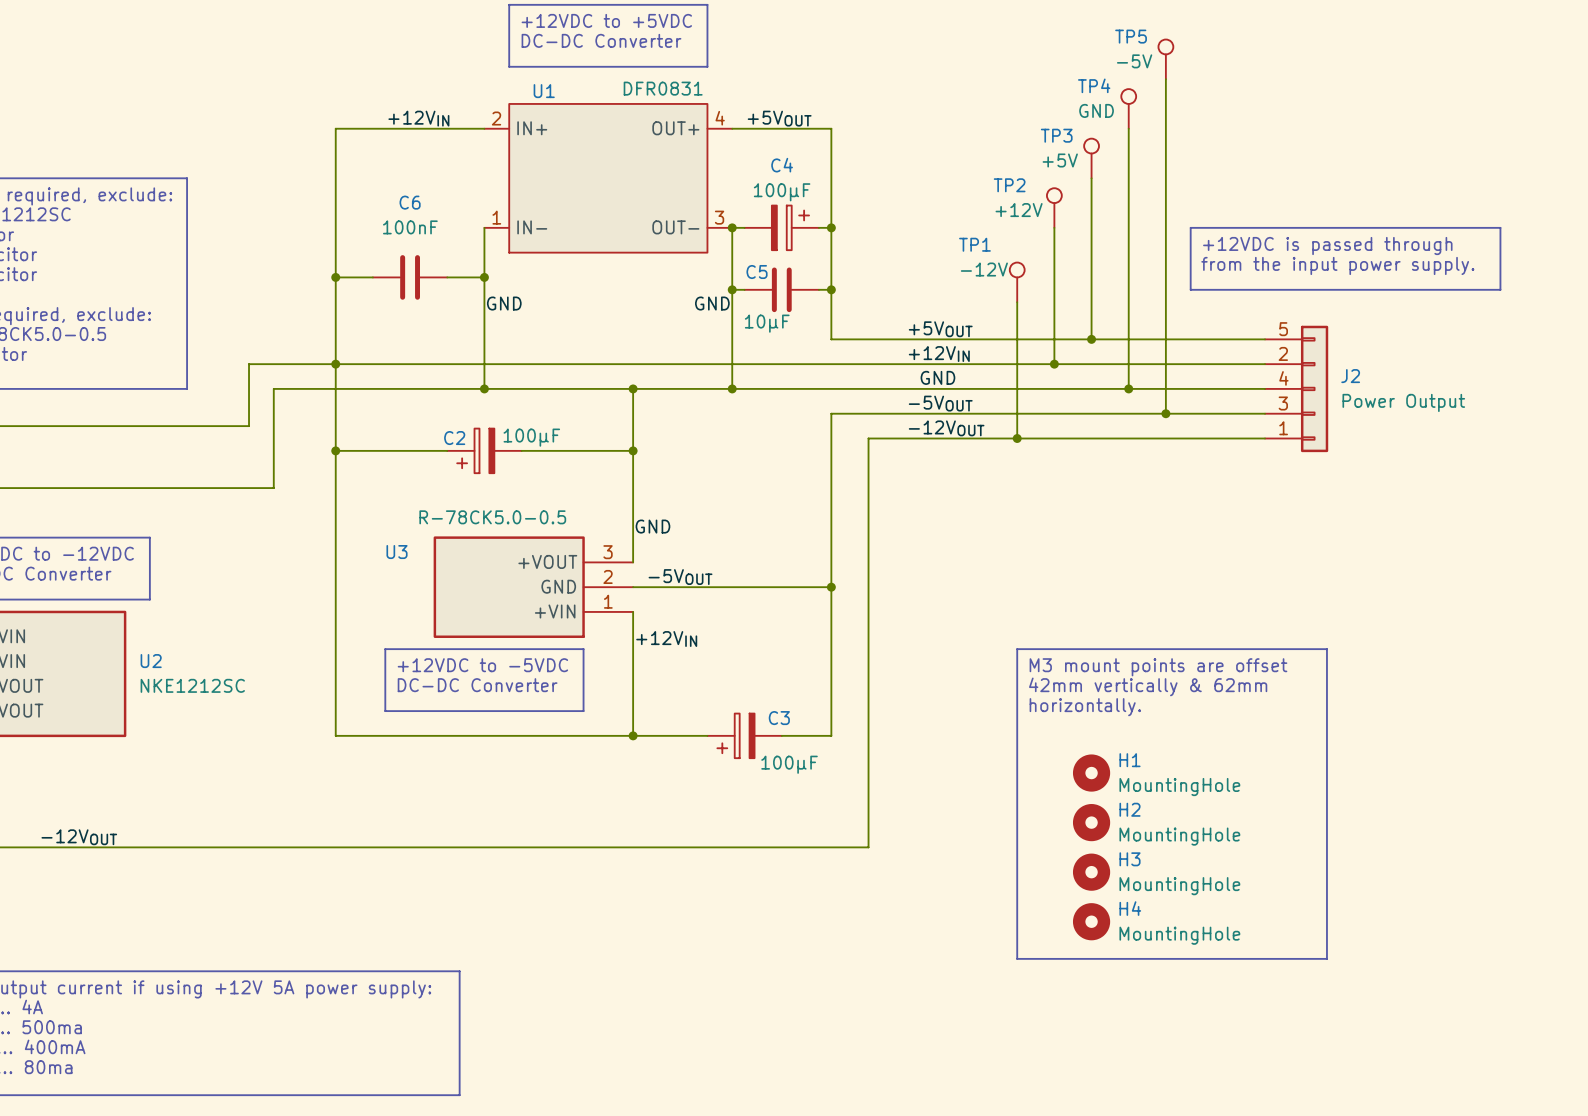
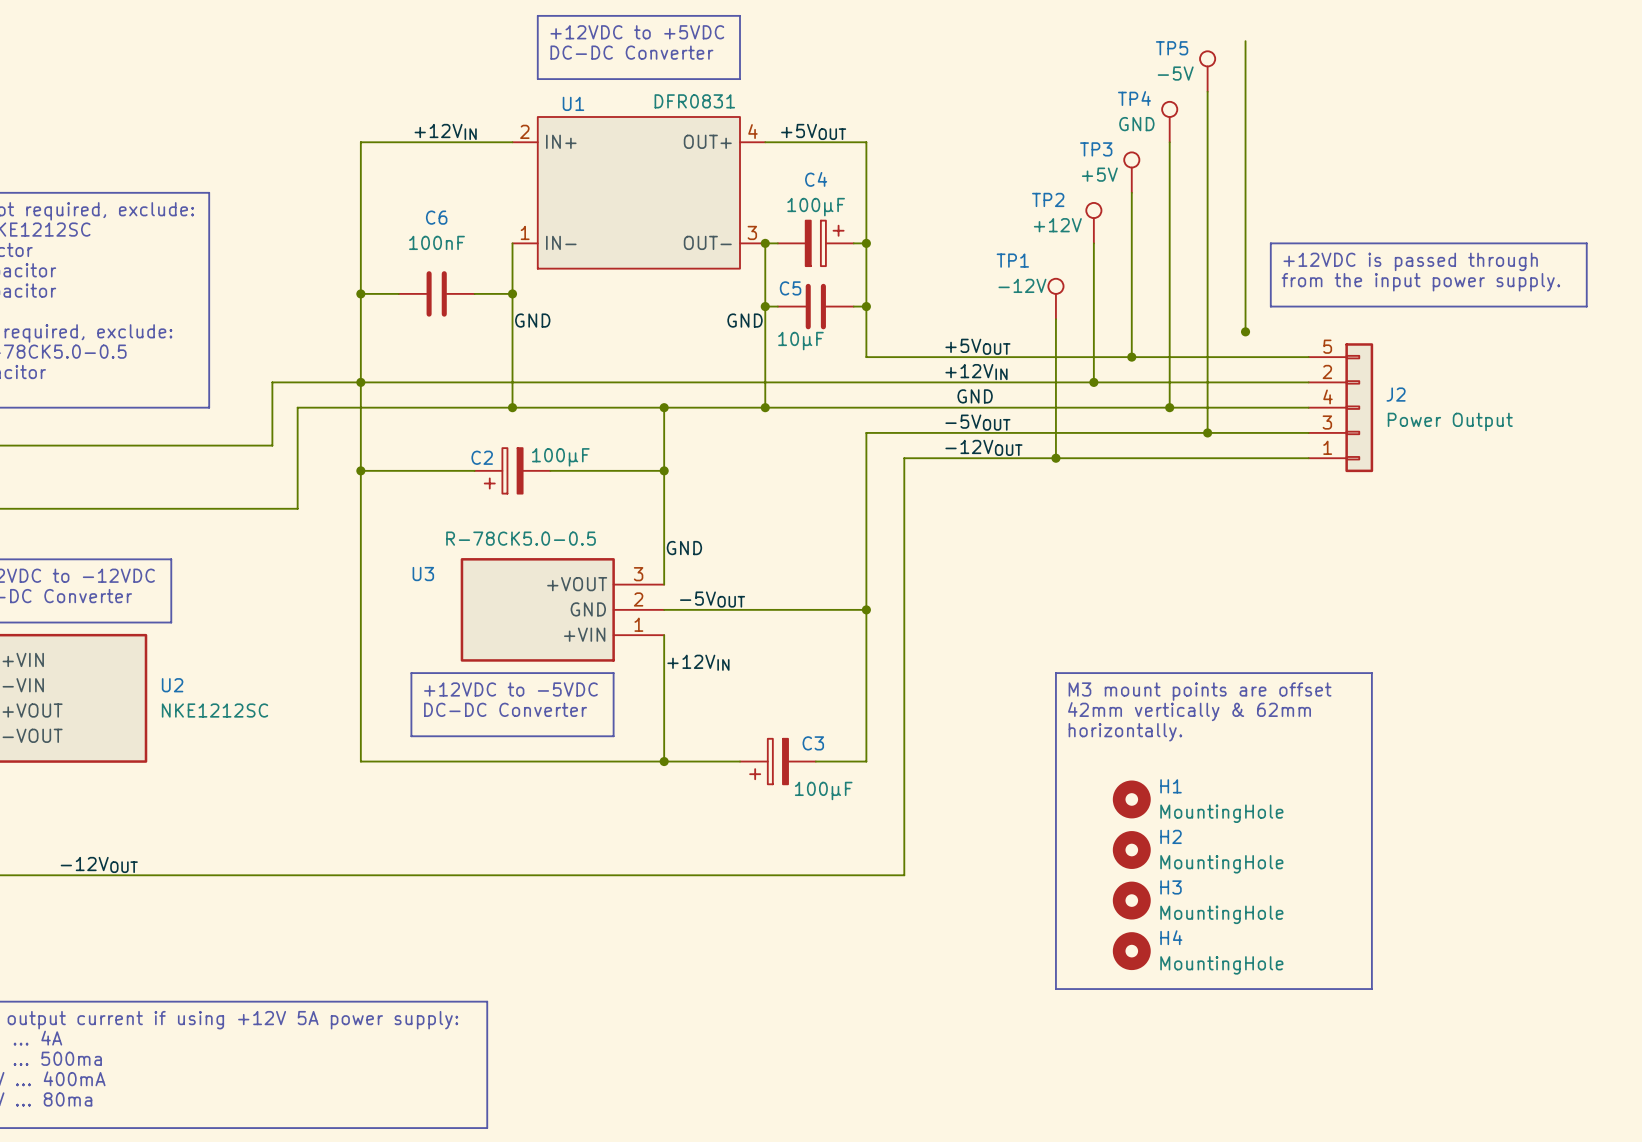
wire: none -> (1245, 41) (1245, 331)
line: (1227, 227) (1190, 227) (1190, 289) (1227, 289) -> (1270, 243) (1270, 306)
line: (1500, 227) (1500, 289) -> (1548, 243) (1586, 243) (1586, 306) (1548, 306)
text position: +12VDC is passed through (1327, 246) -> +12VDC is passed through (1410, 261)
text position: from the input power supply. (1337, 265) -> from the input power supply. (1420, 282)
junction: none -> (1245, 331)

